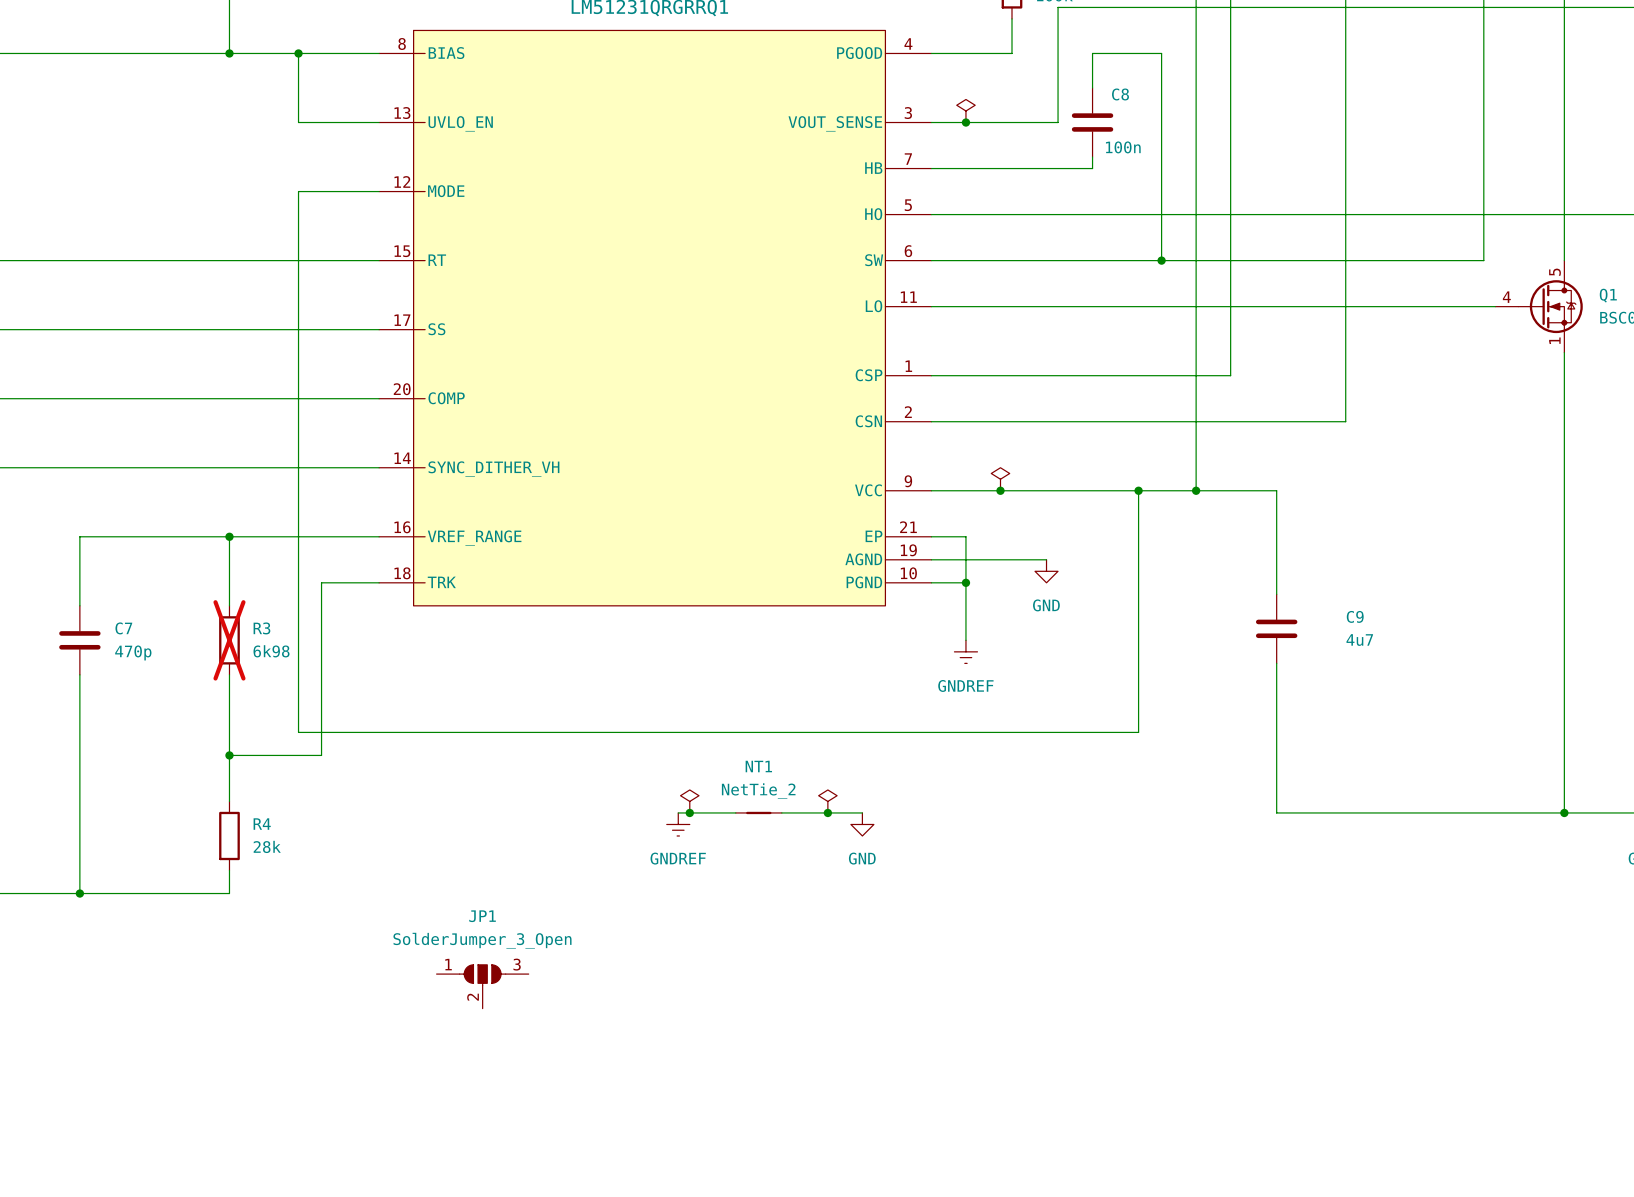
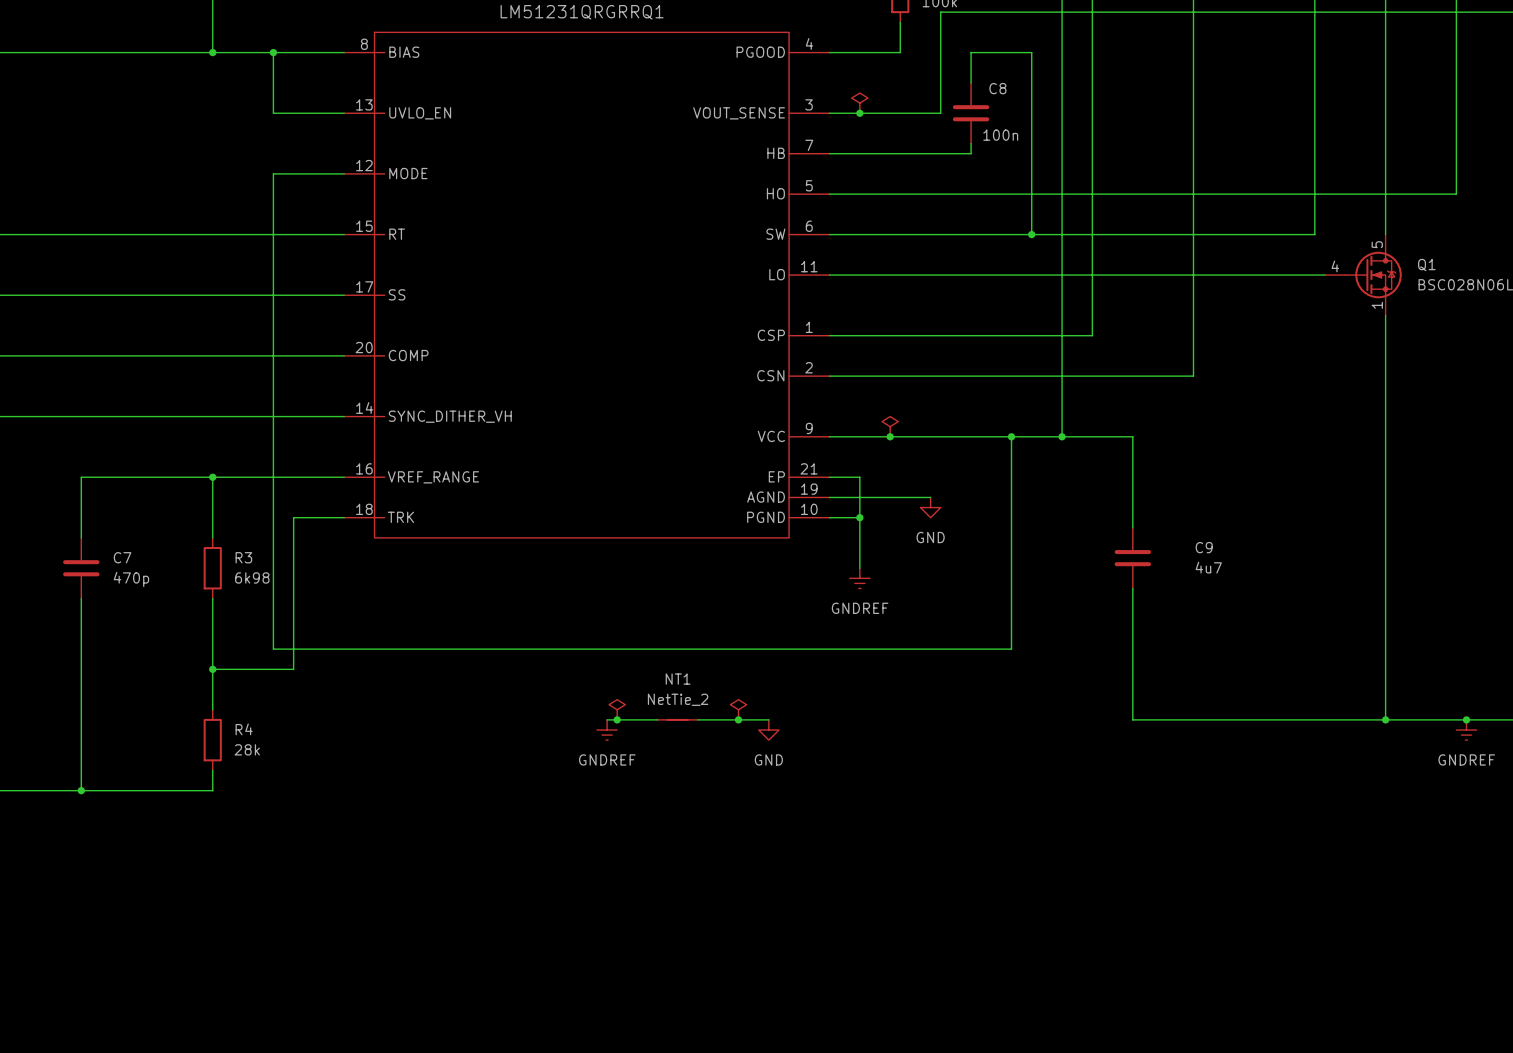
R3 do-not-place cross: (229, 640) -> none
JP1: SolderJumper_3_Open (482, 986) -> none

